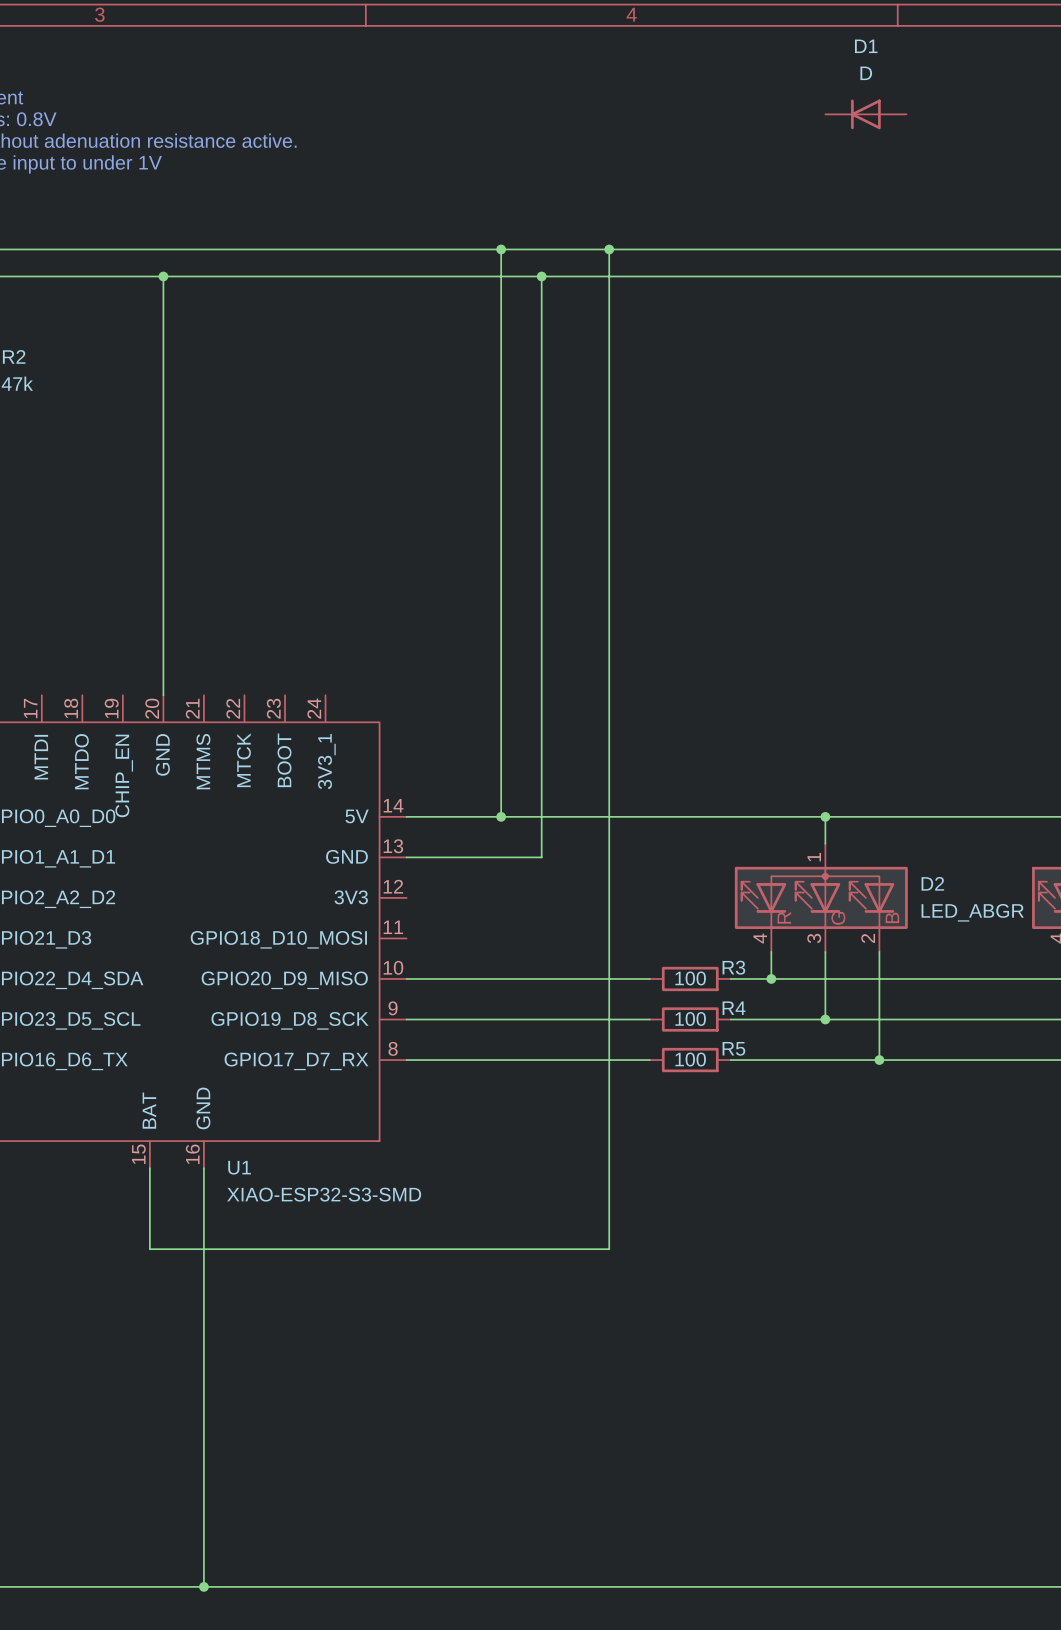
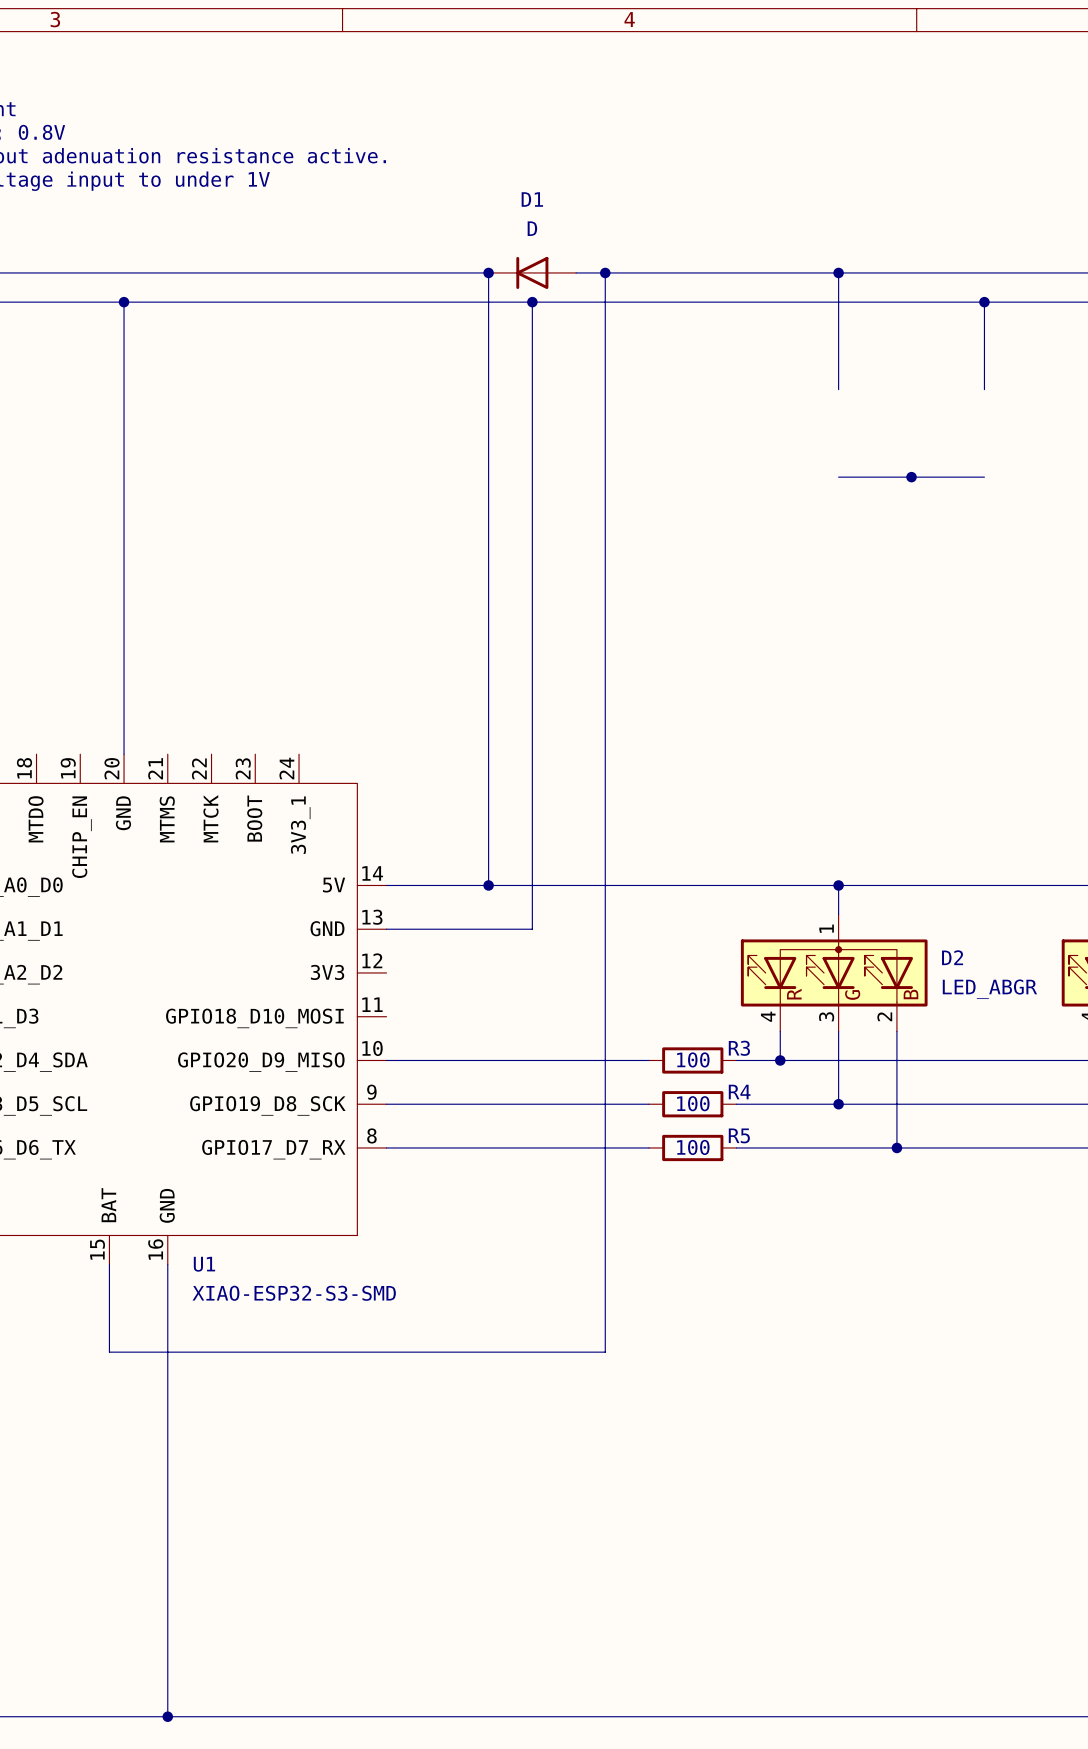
D1 position: (865, 114) -> (532, 272)
wire: none -> (838, 272) (838, 389)
junction: none -> (838, 272)
wire: none -> (984, 302) (984, 389)
junction: none -> (984, 302)
wire: none -> (838, 477) (984, 477)
junction: none -> (911, 477)

